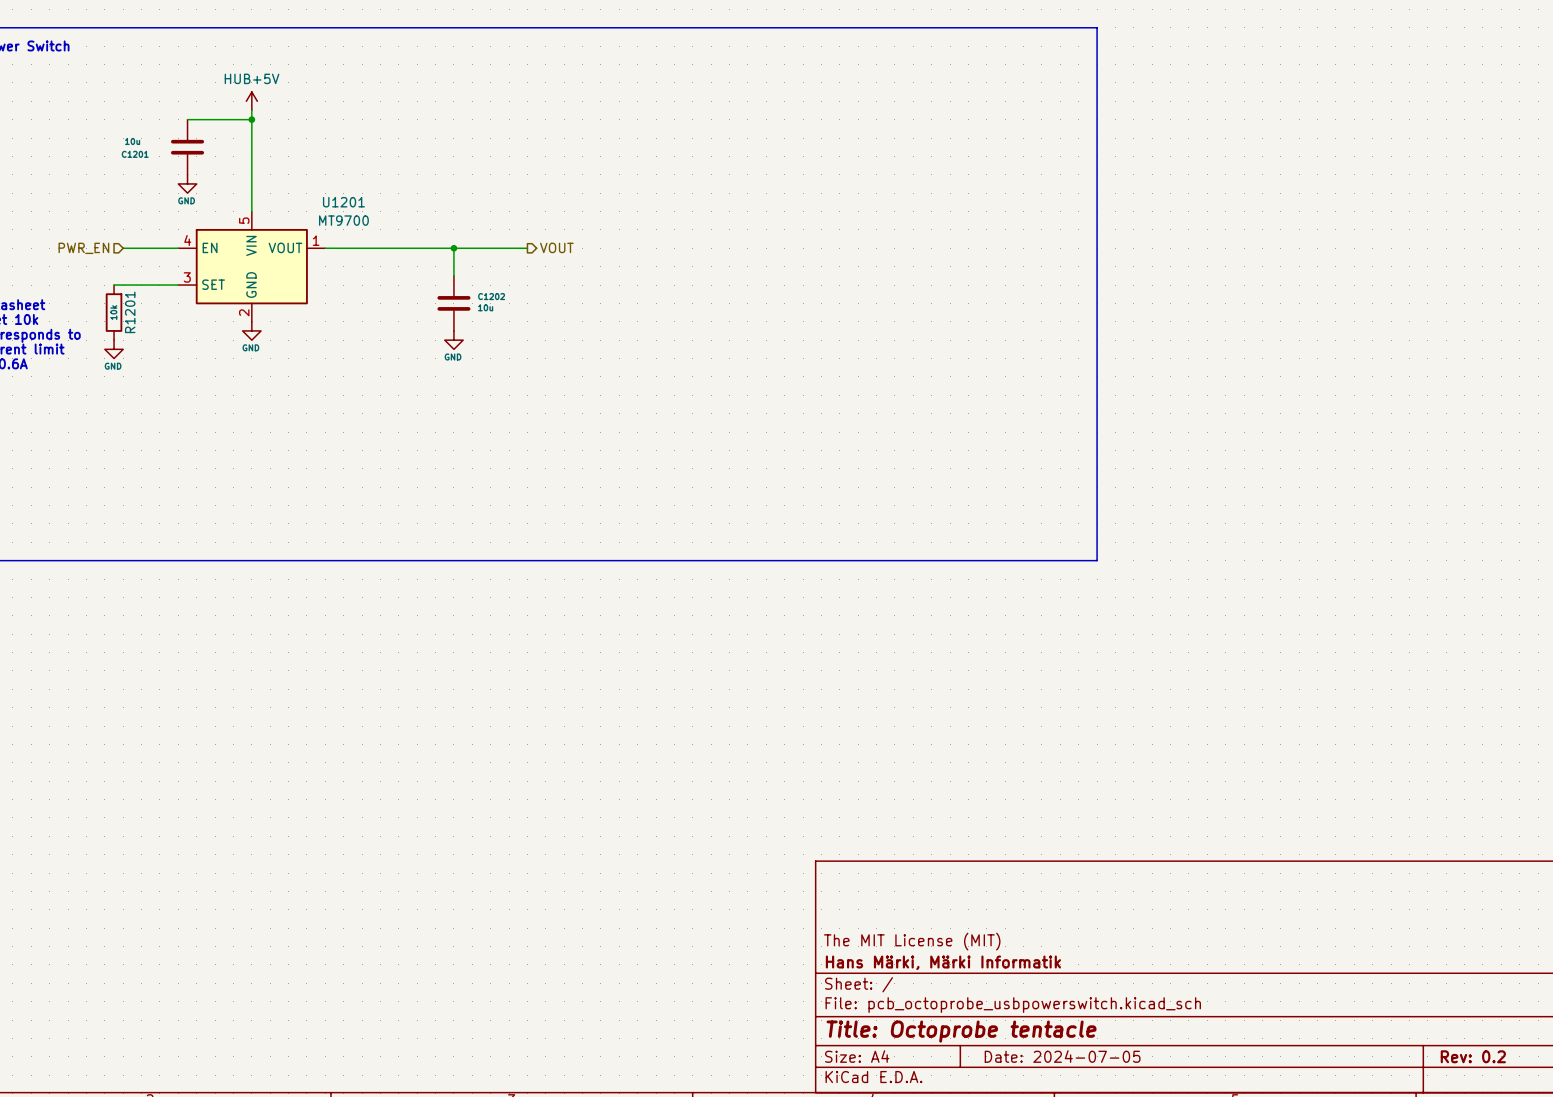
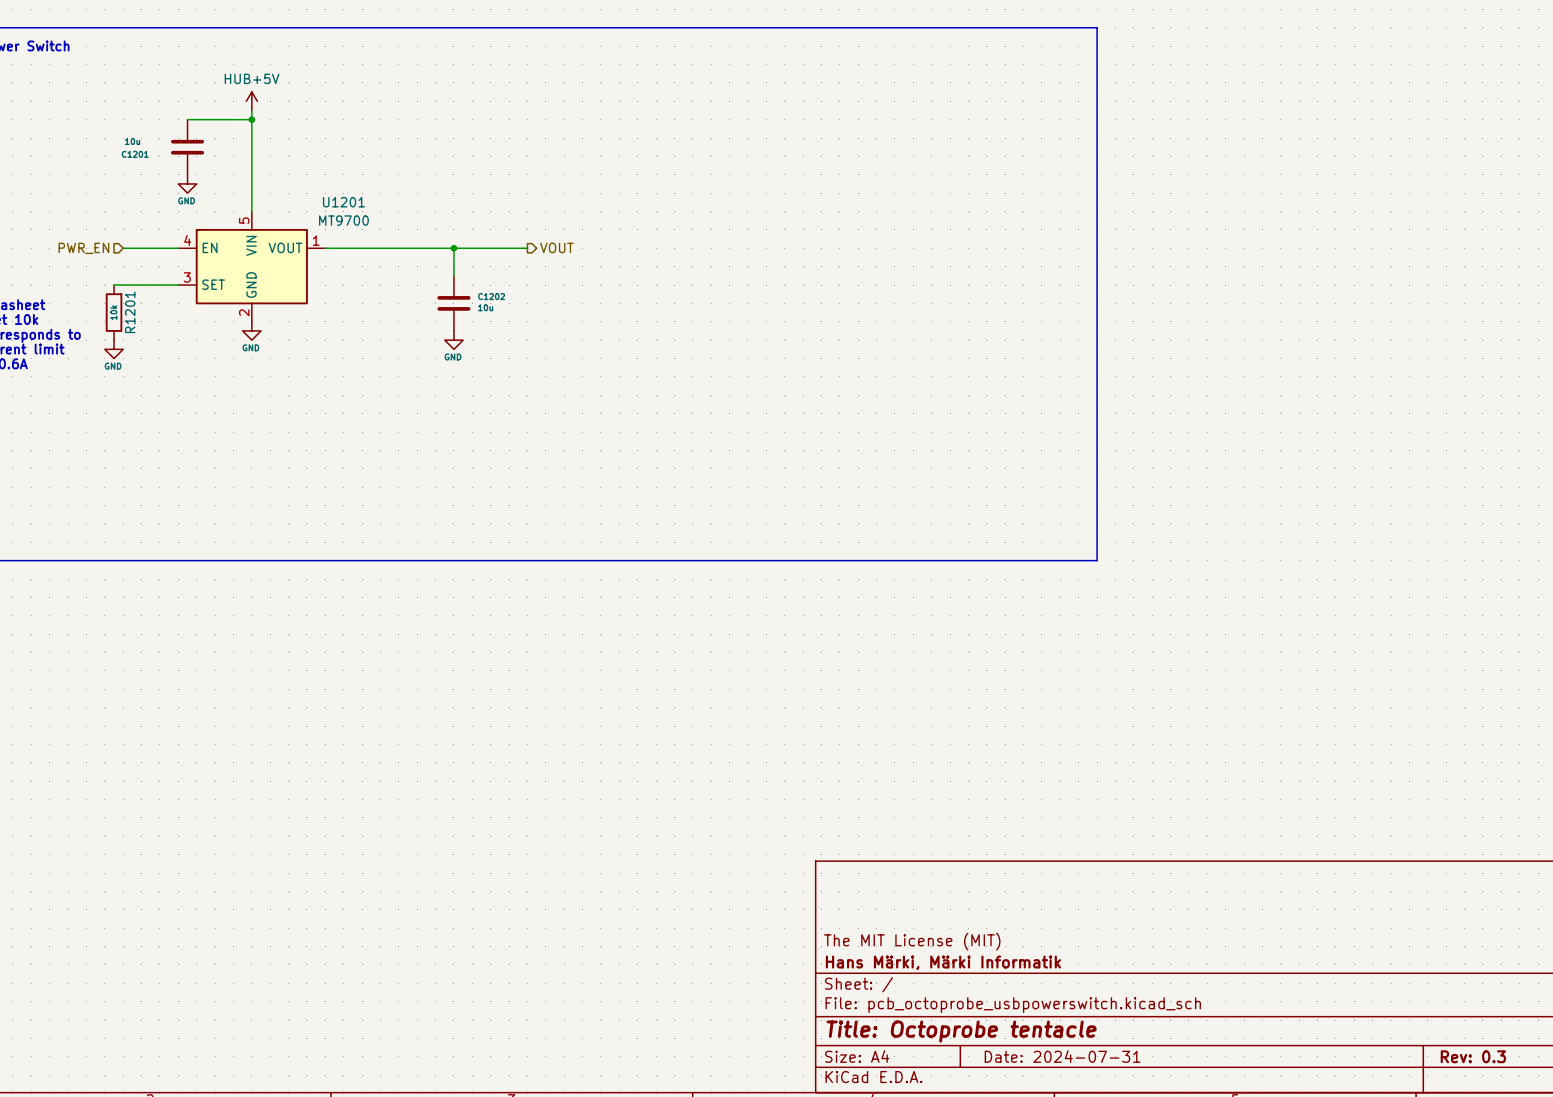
title block: Date: 2024-07-05 (1062, 1056) -> Date: 2024-07-31 (1062, 1056)
title block: Rev: 0.2 (1473, 1056) -> Rev: 0.3 (1473, 1056)

